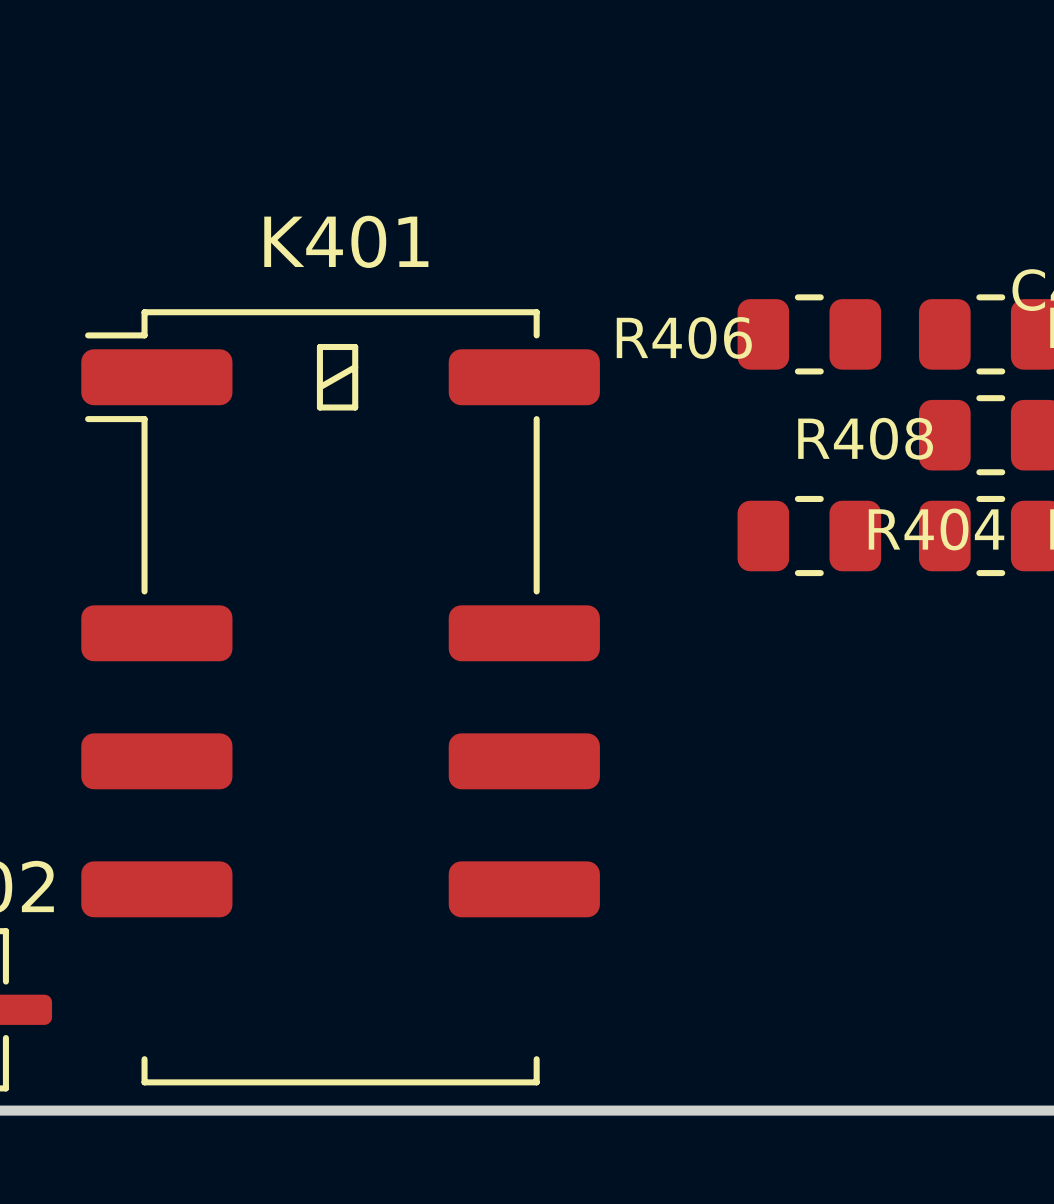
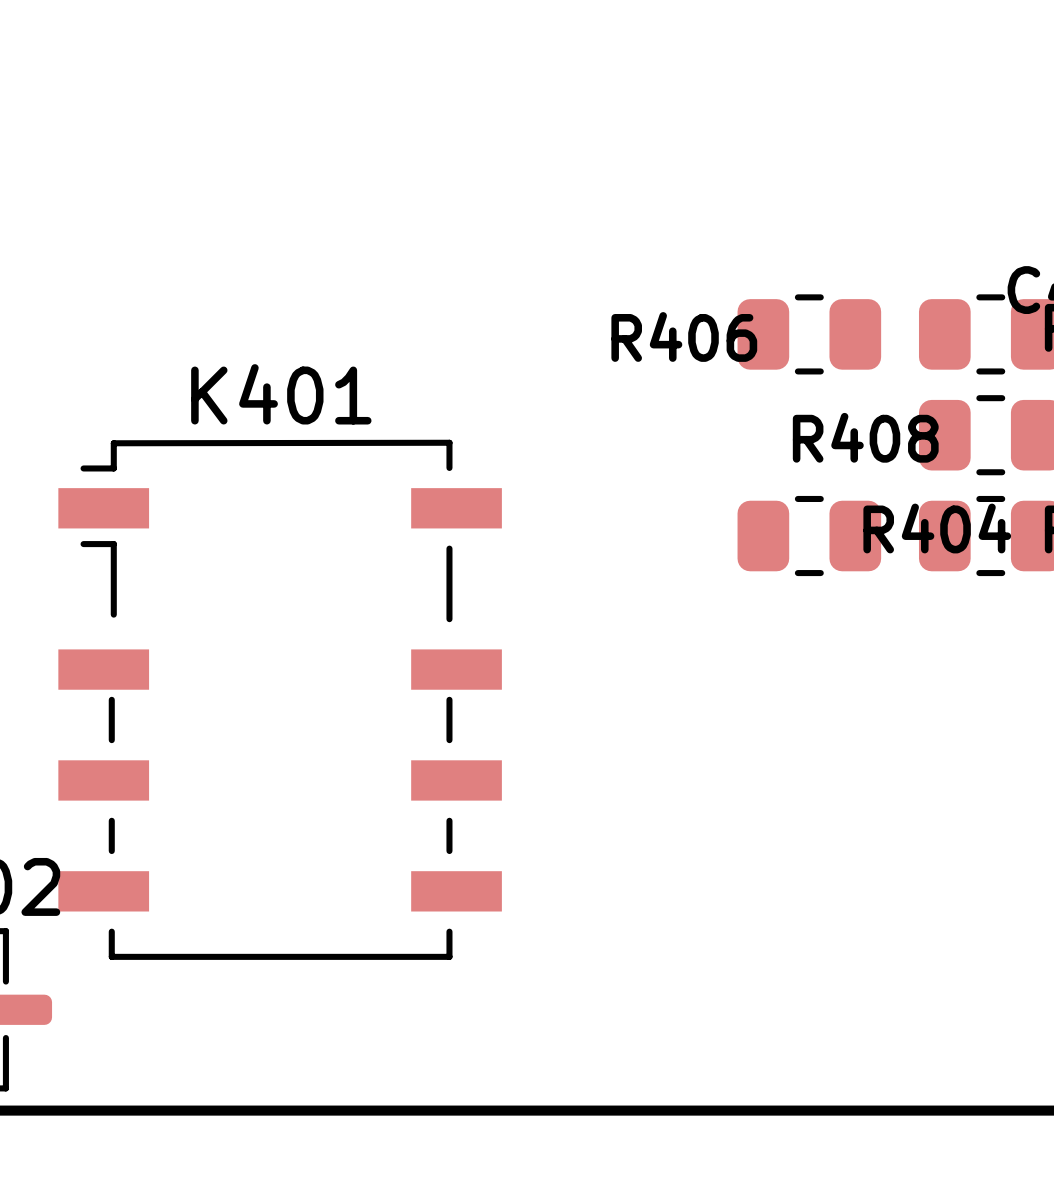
K401 name position: K401 (346, 241) -> K401 (281, 394)
K401 footprint: [81, 309, 600, 1086] -> [58, 439, 502, 960]

